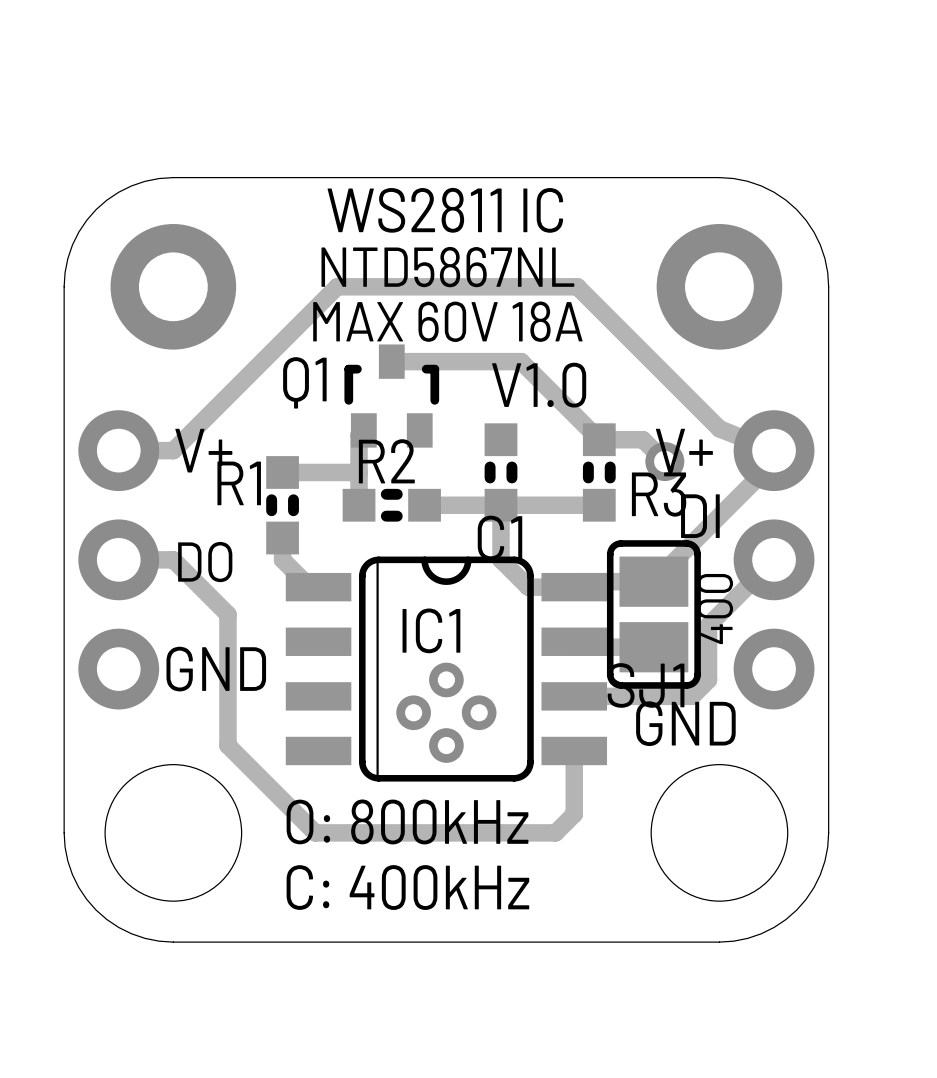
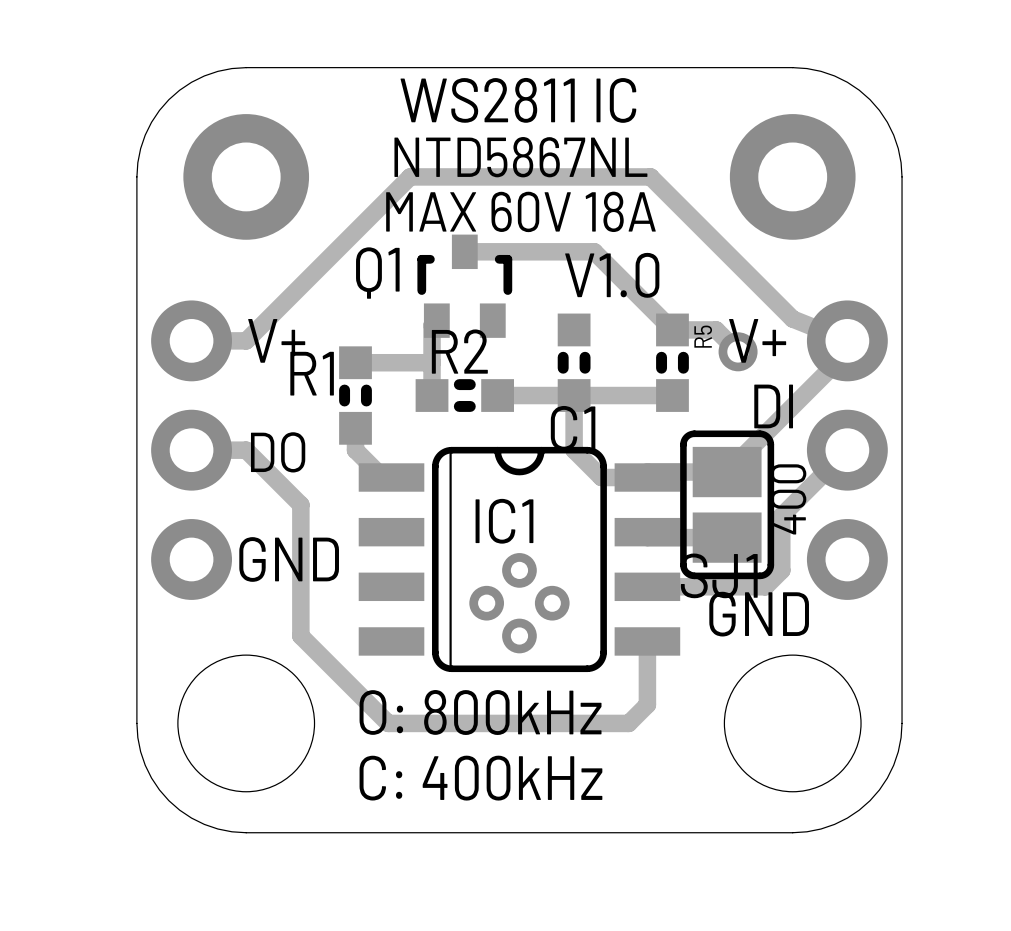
R3 name: R3 (659, 494) -> R5 (703, 336)

